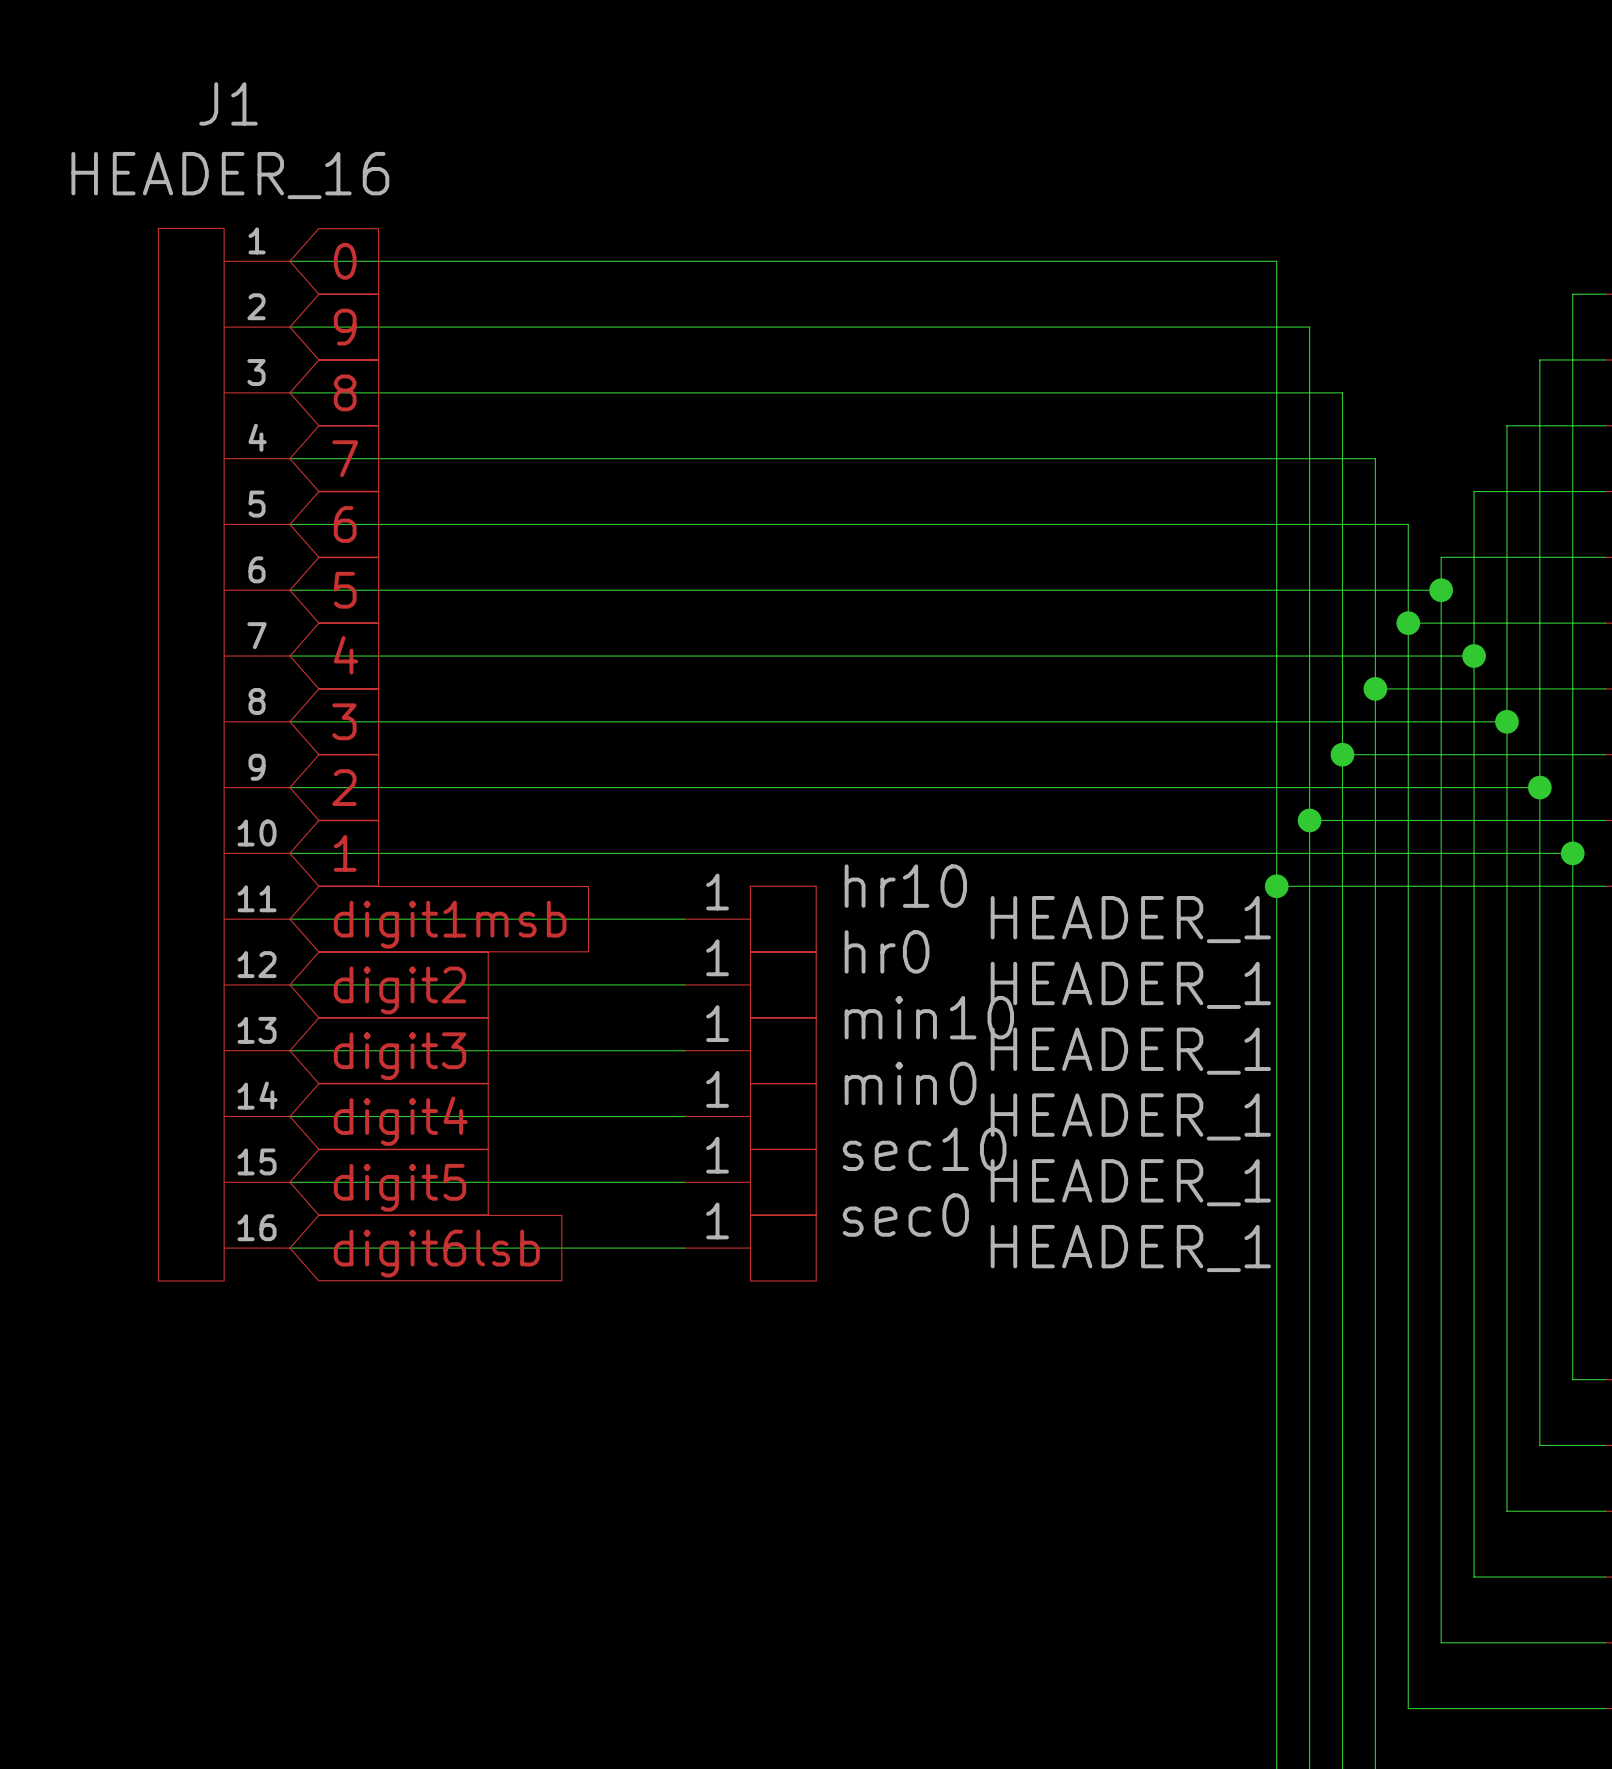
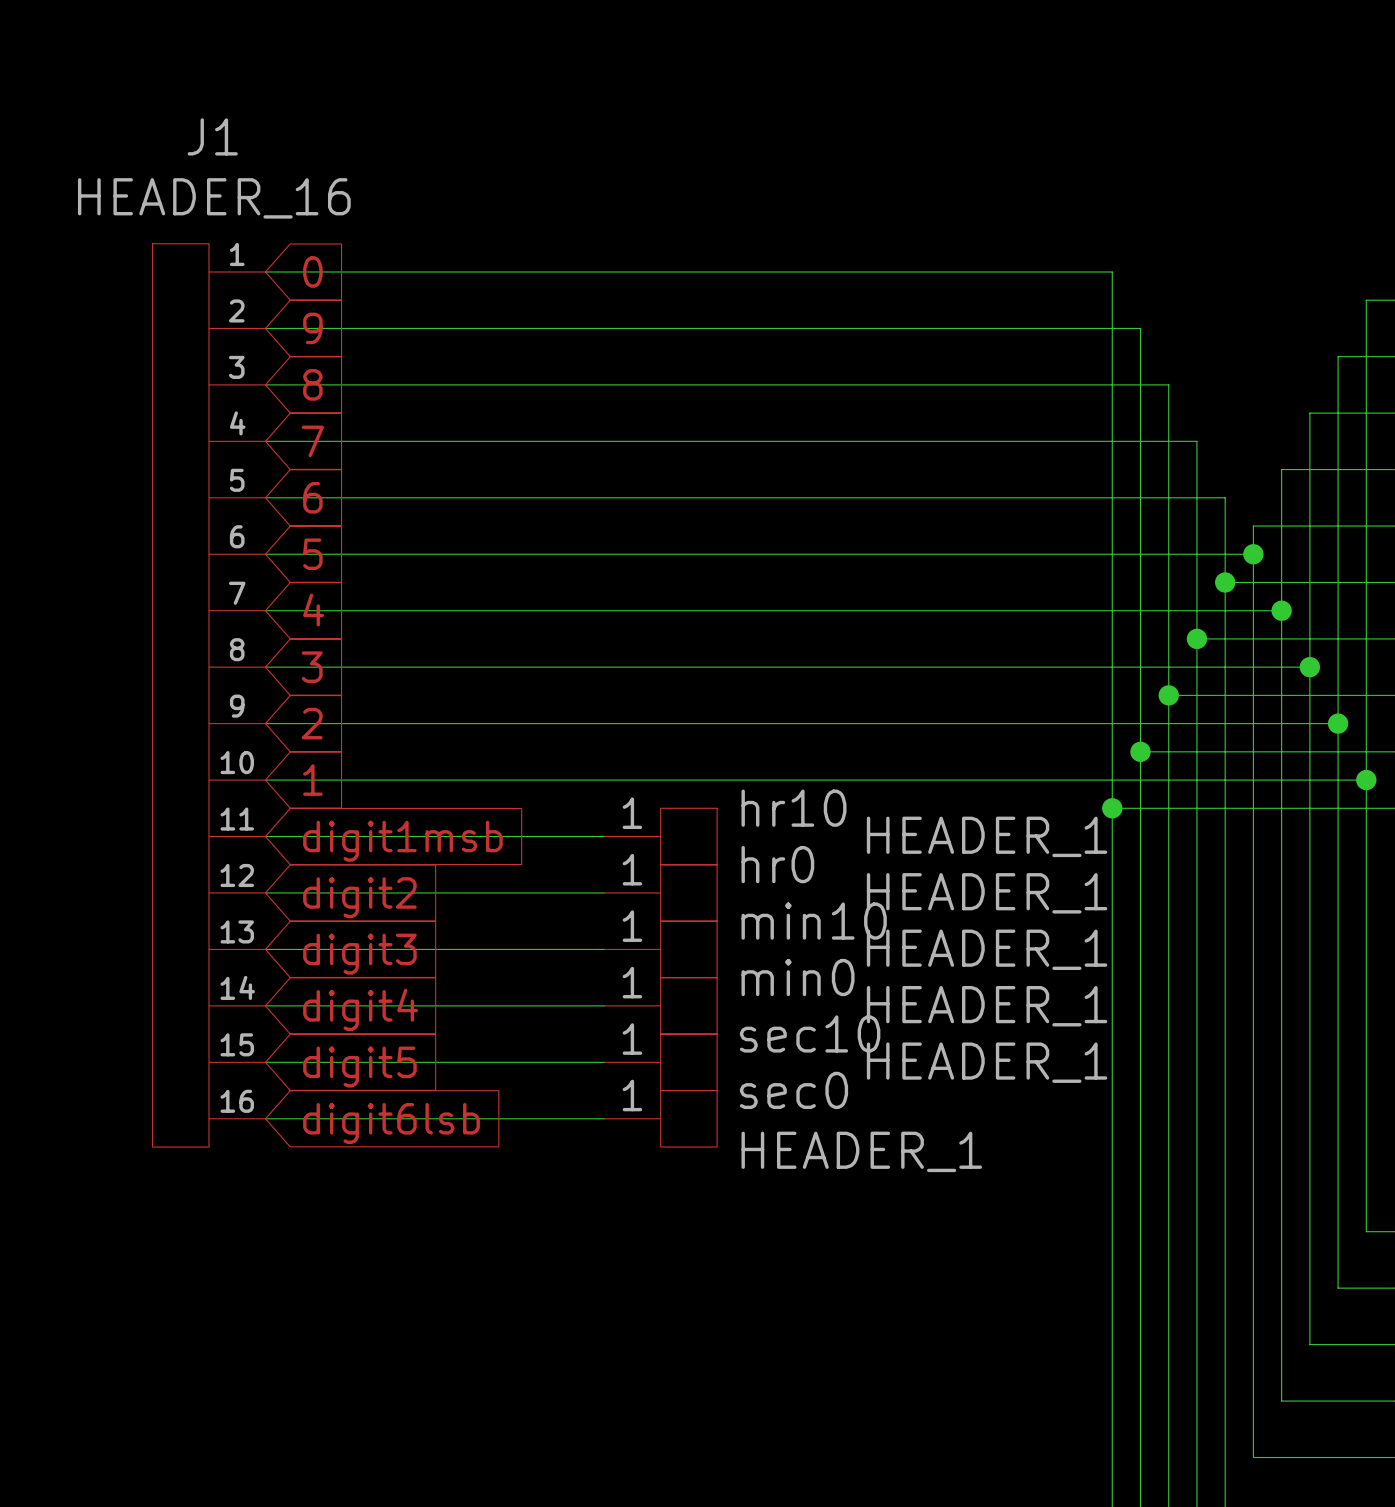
sec0 value position: HEADER_1 (1130, 1248) -> HEADER_1 (861, 1151)

